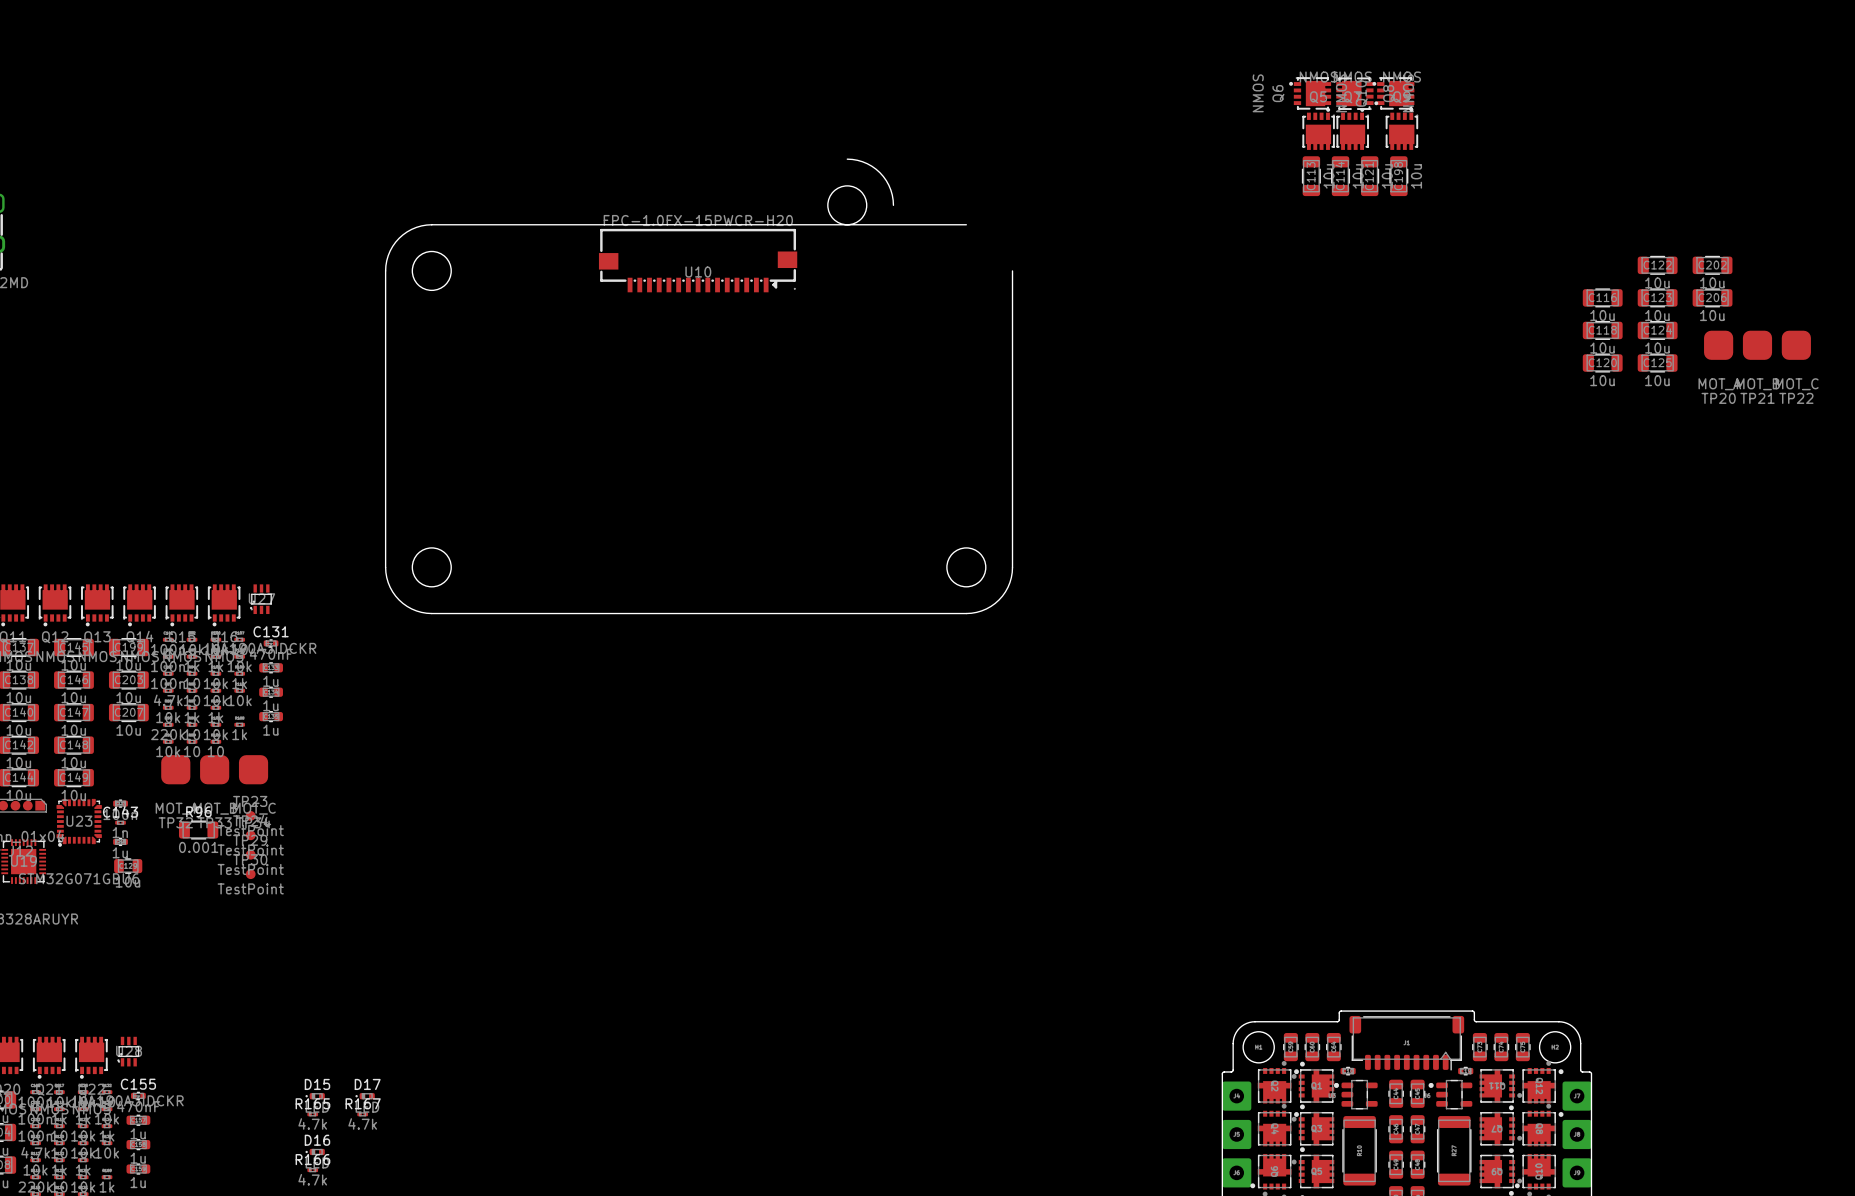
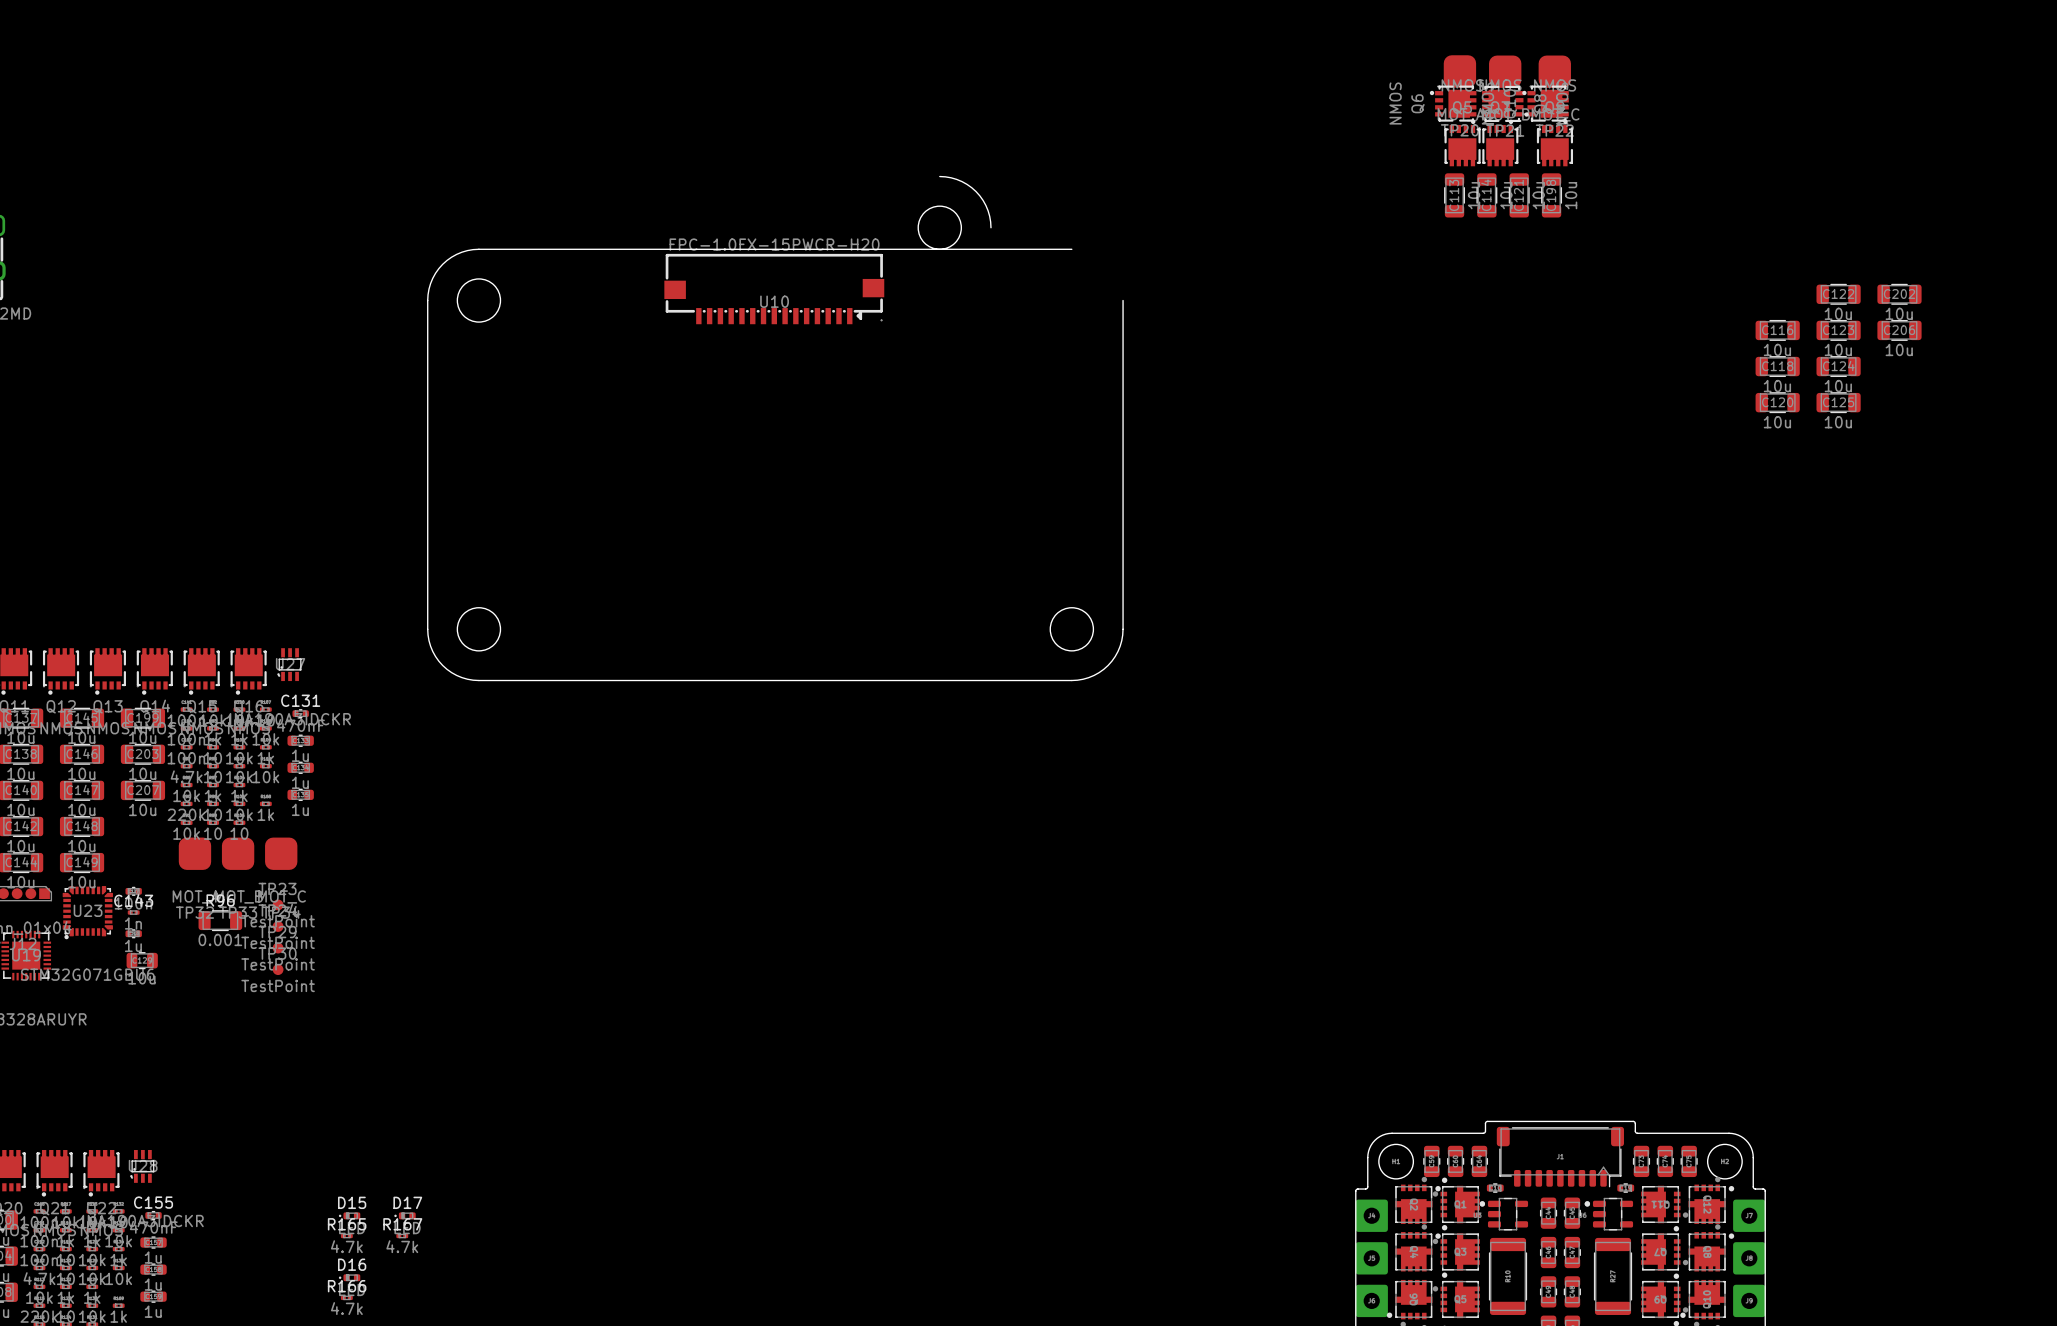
TP20 position: (1718, 345) -> (1459, 71)
TP21 position: (1757, 345) -> (1505, 71)
TP22 position: (1796, 345) -> (1554, 71)

